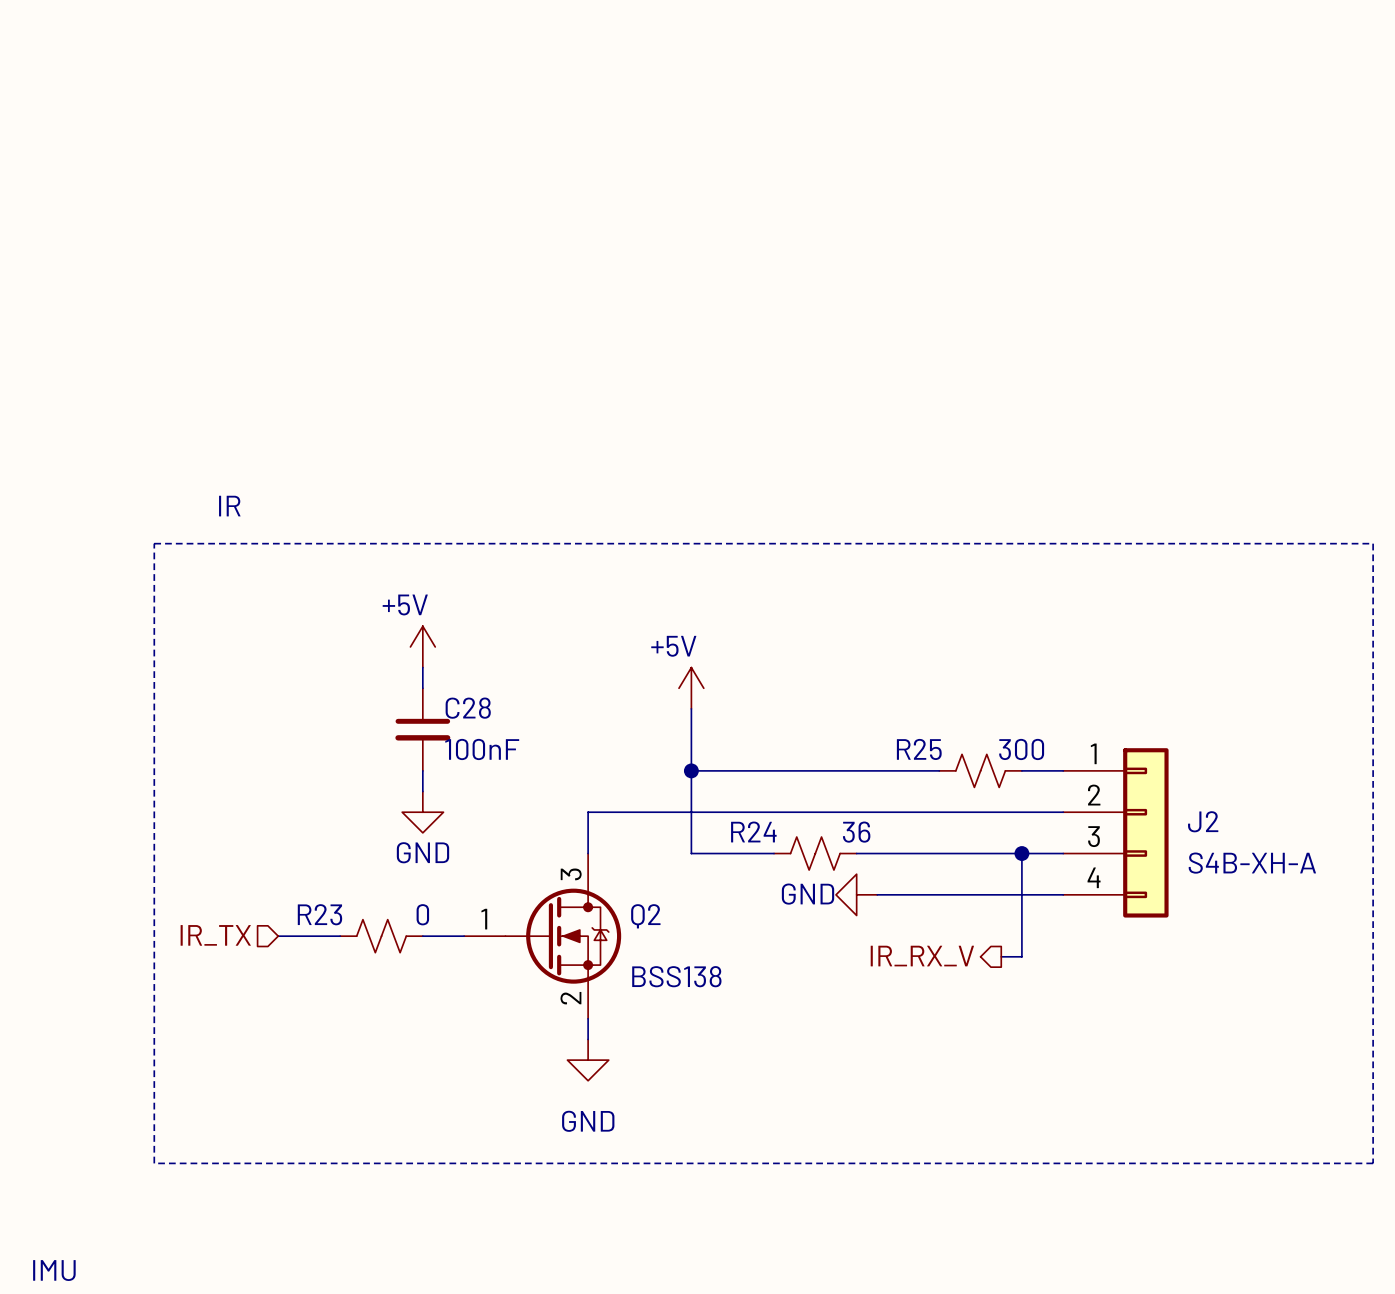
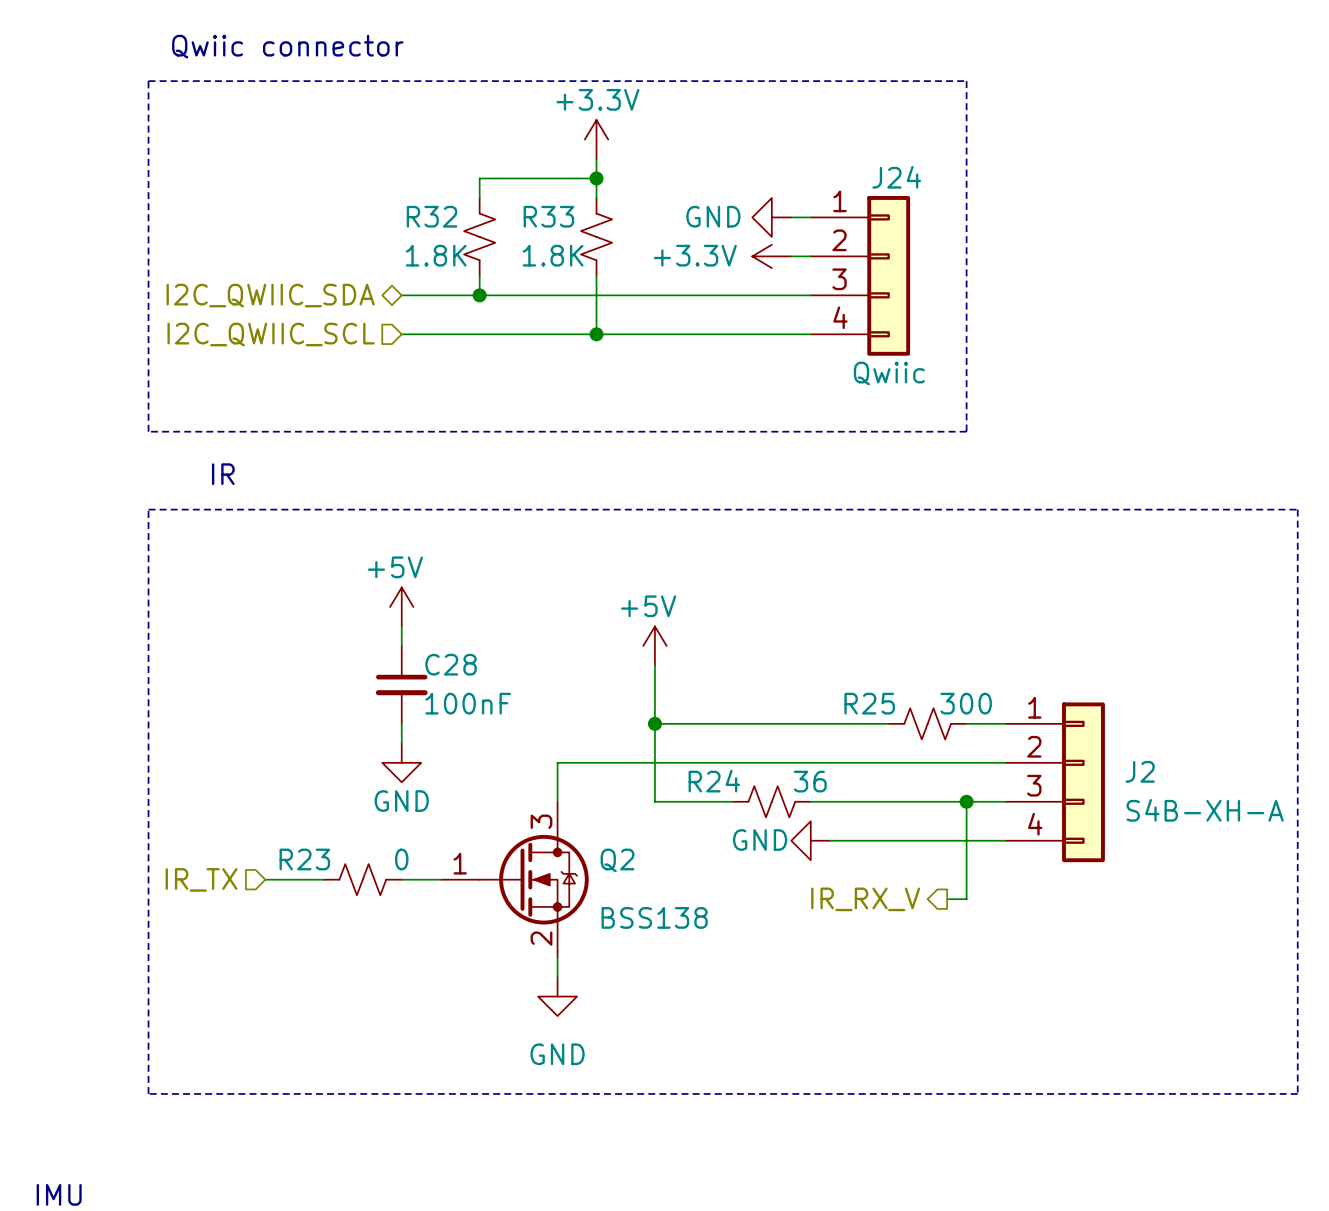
text: none -> Qwiic connector (287, 46)
line: none -> (148, 81) (966, 81) (966, 431) (148, 431) (148, 81)
power symbol: none -> +3.3V (596, 139)
wire: none -> (596, 159) (596, 197)
wire: none -> (596, 178) (479, 178) (479, 197)
junction: none -> (596, 178)
power symbol: none -> GND (771, 217)
wire: none -> (791, 217) (810, 217)
R32: none -> 1.8K (479, 236)
R33: none -> 1.8K (596, 236)
power symbol: none -> +3.3V (771, 256)
wire: none -> (791, 256) (810, 256)
wire: none -> (479, 275) (479, 295)
wire: none -> (596, 275) (596, 334)
J24: none -> Qwiic (860, 275)
wire: none -> (401, 295) (810, 295)
junction: none -> (479, 295)
hierarchical label: none -> I2C_QWIIC_SDA (270, 295)
wire: none -> (401, 334) (810, 334)
junction: none -> (596, 334)
hierarchical label: none -> I2C_QWIIC_SCL (271, 334)

